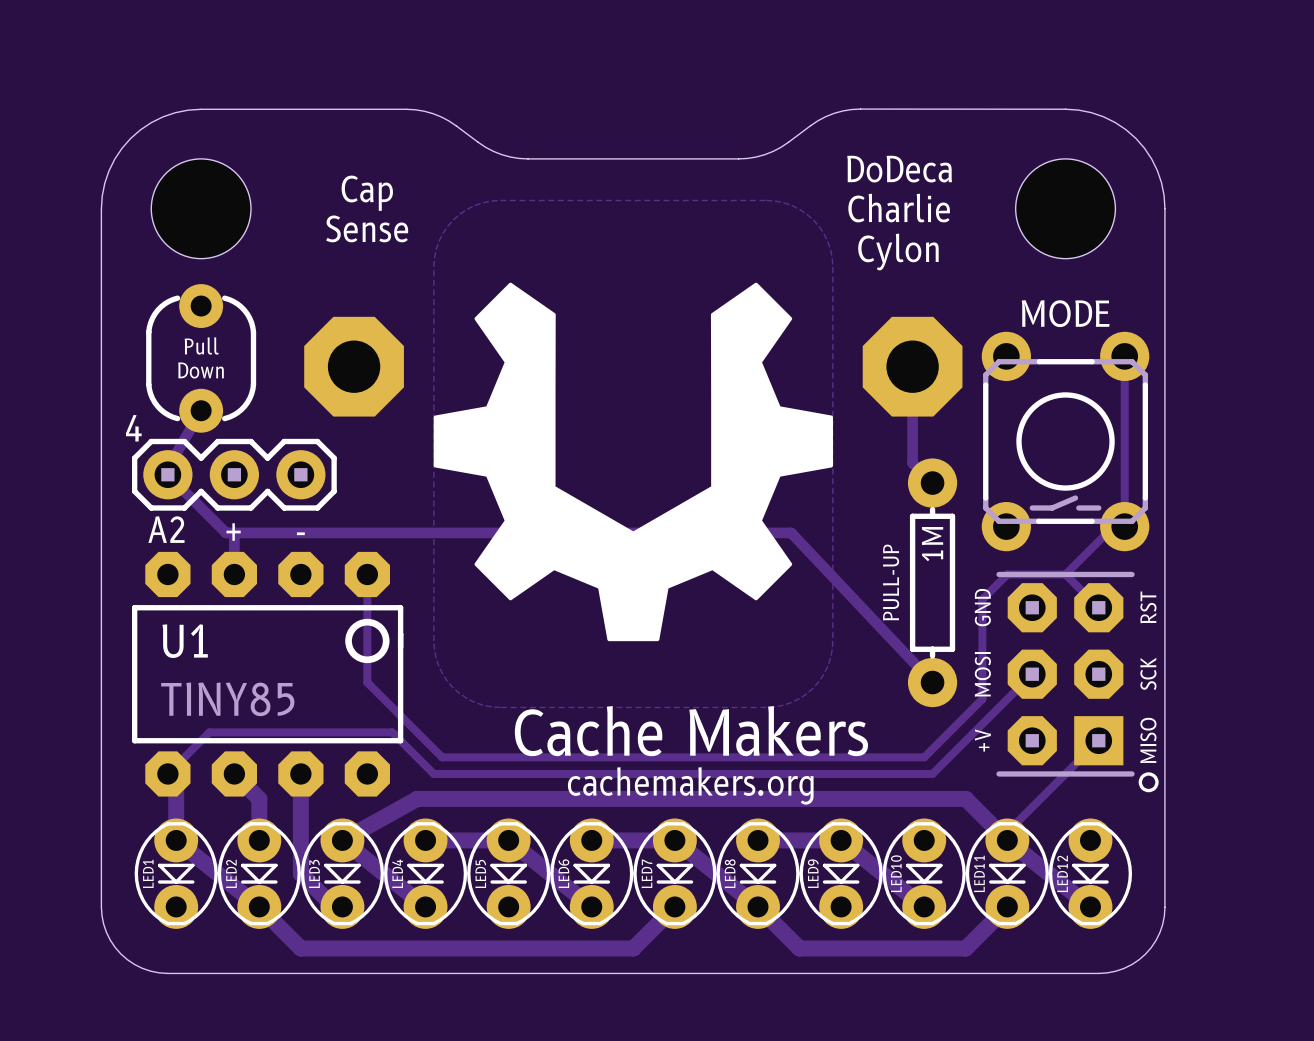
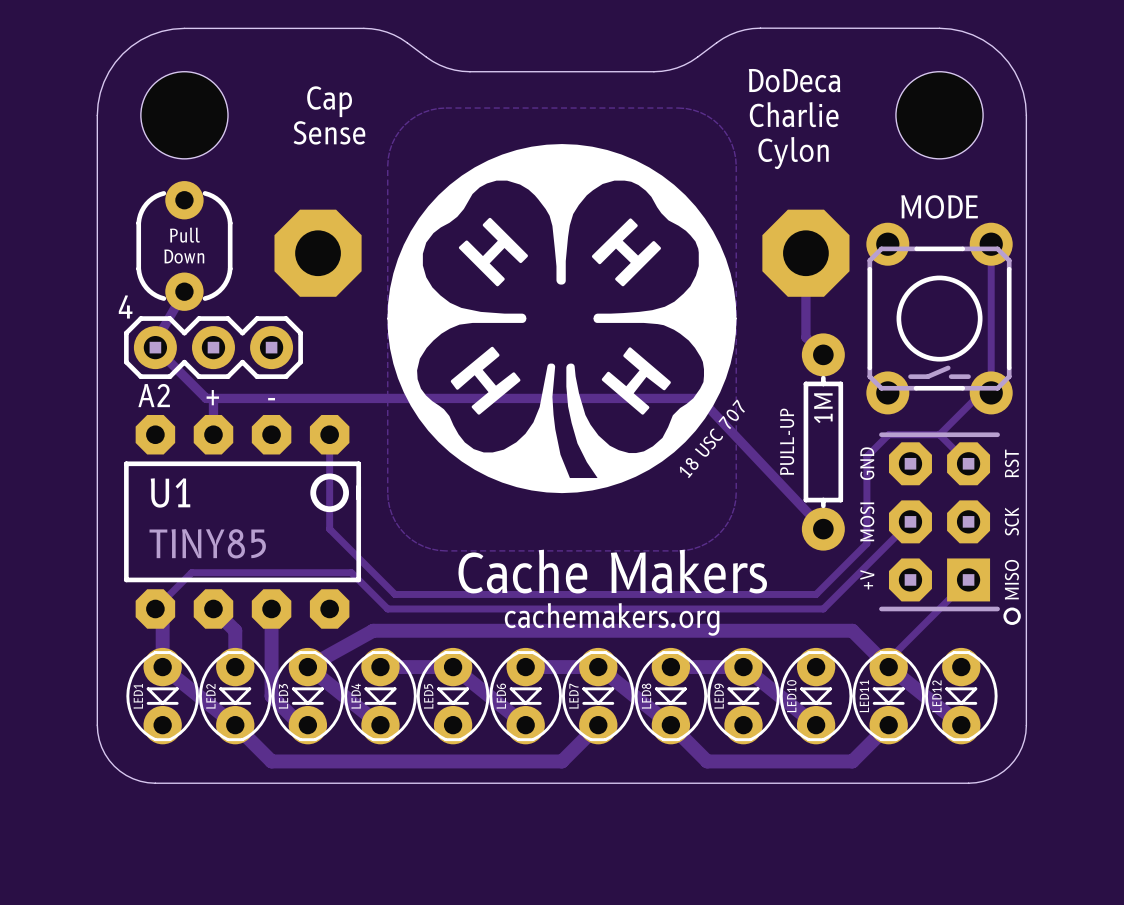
drawing shape: [433, 282, 833, 642] -> [387, 144, 745, 494]

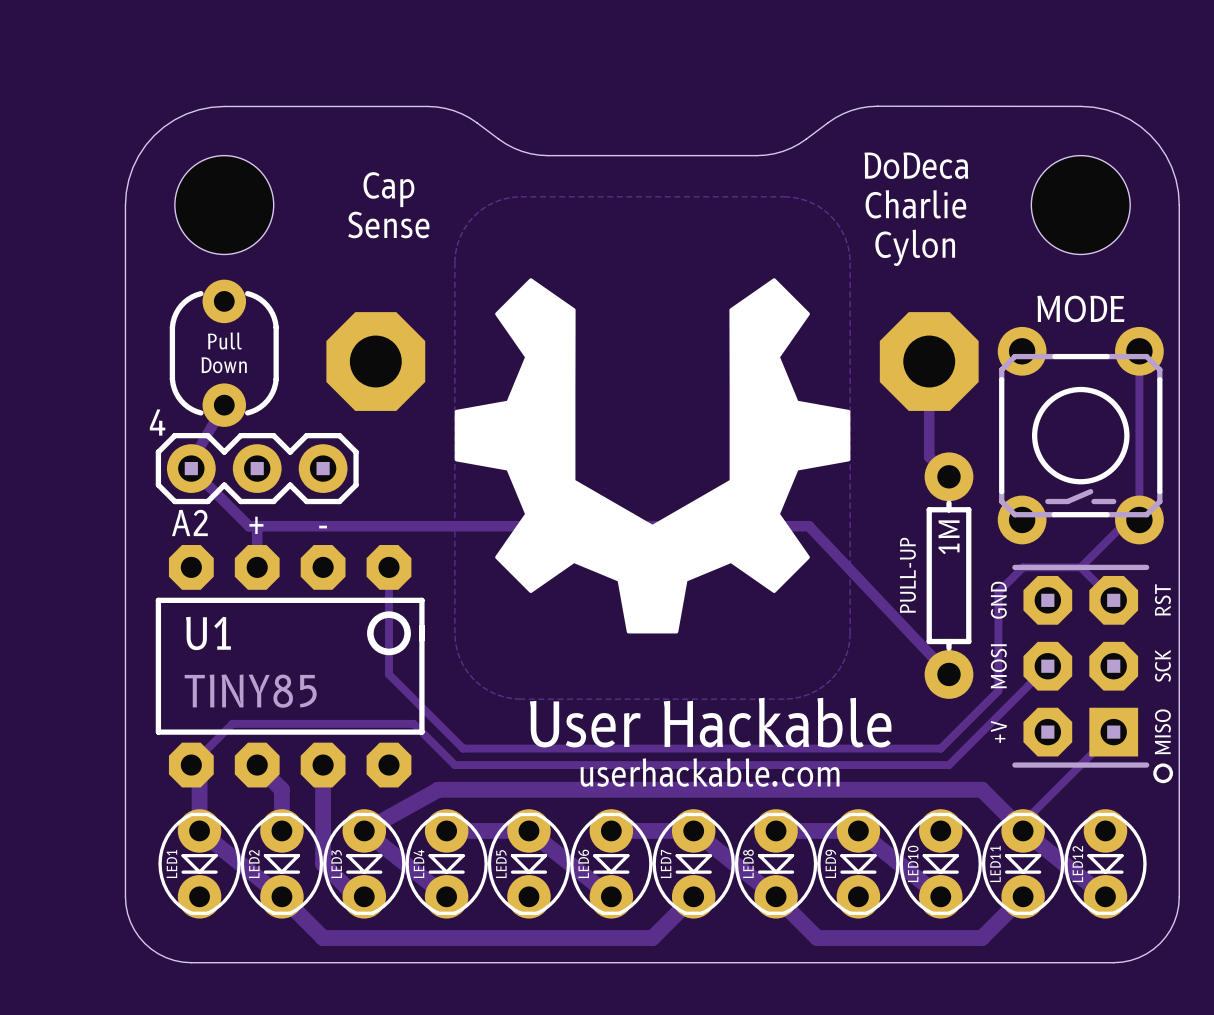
drawing shape: [387, 144, 745, 494] -> [454, 278, 851, 634]
text: Cache Makers (612, 571) -> User Hackable (710, 722)
text: cachemakers.org (612, 619) -> userhackable.com (710, 772)

